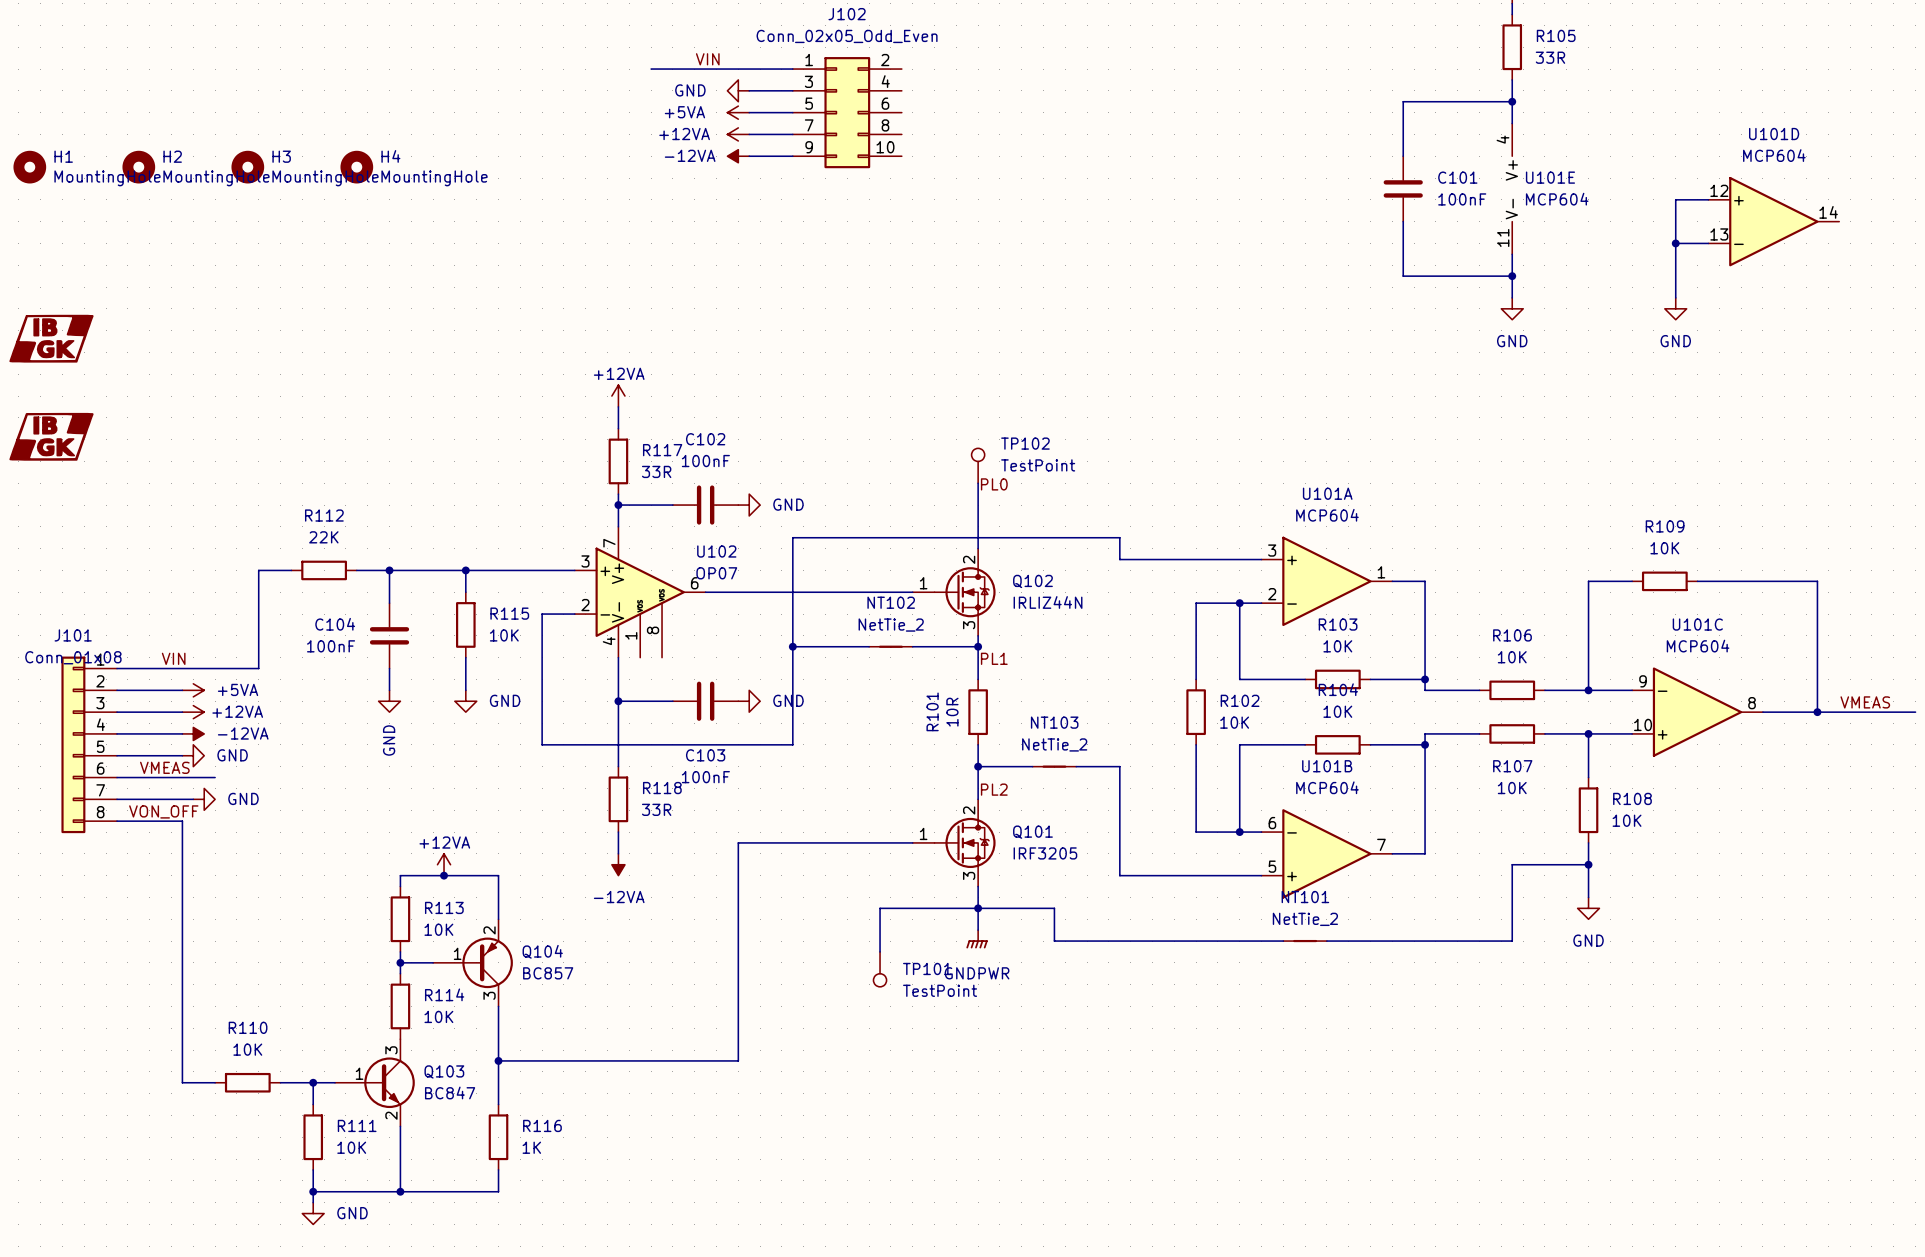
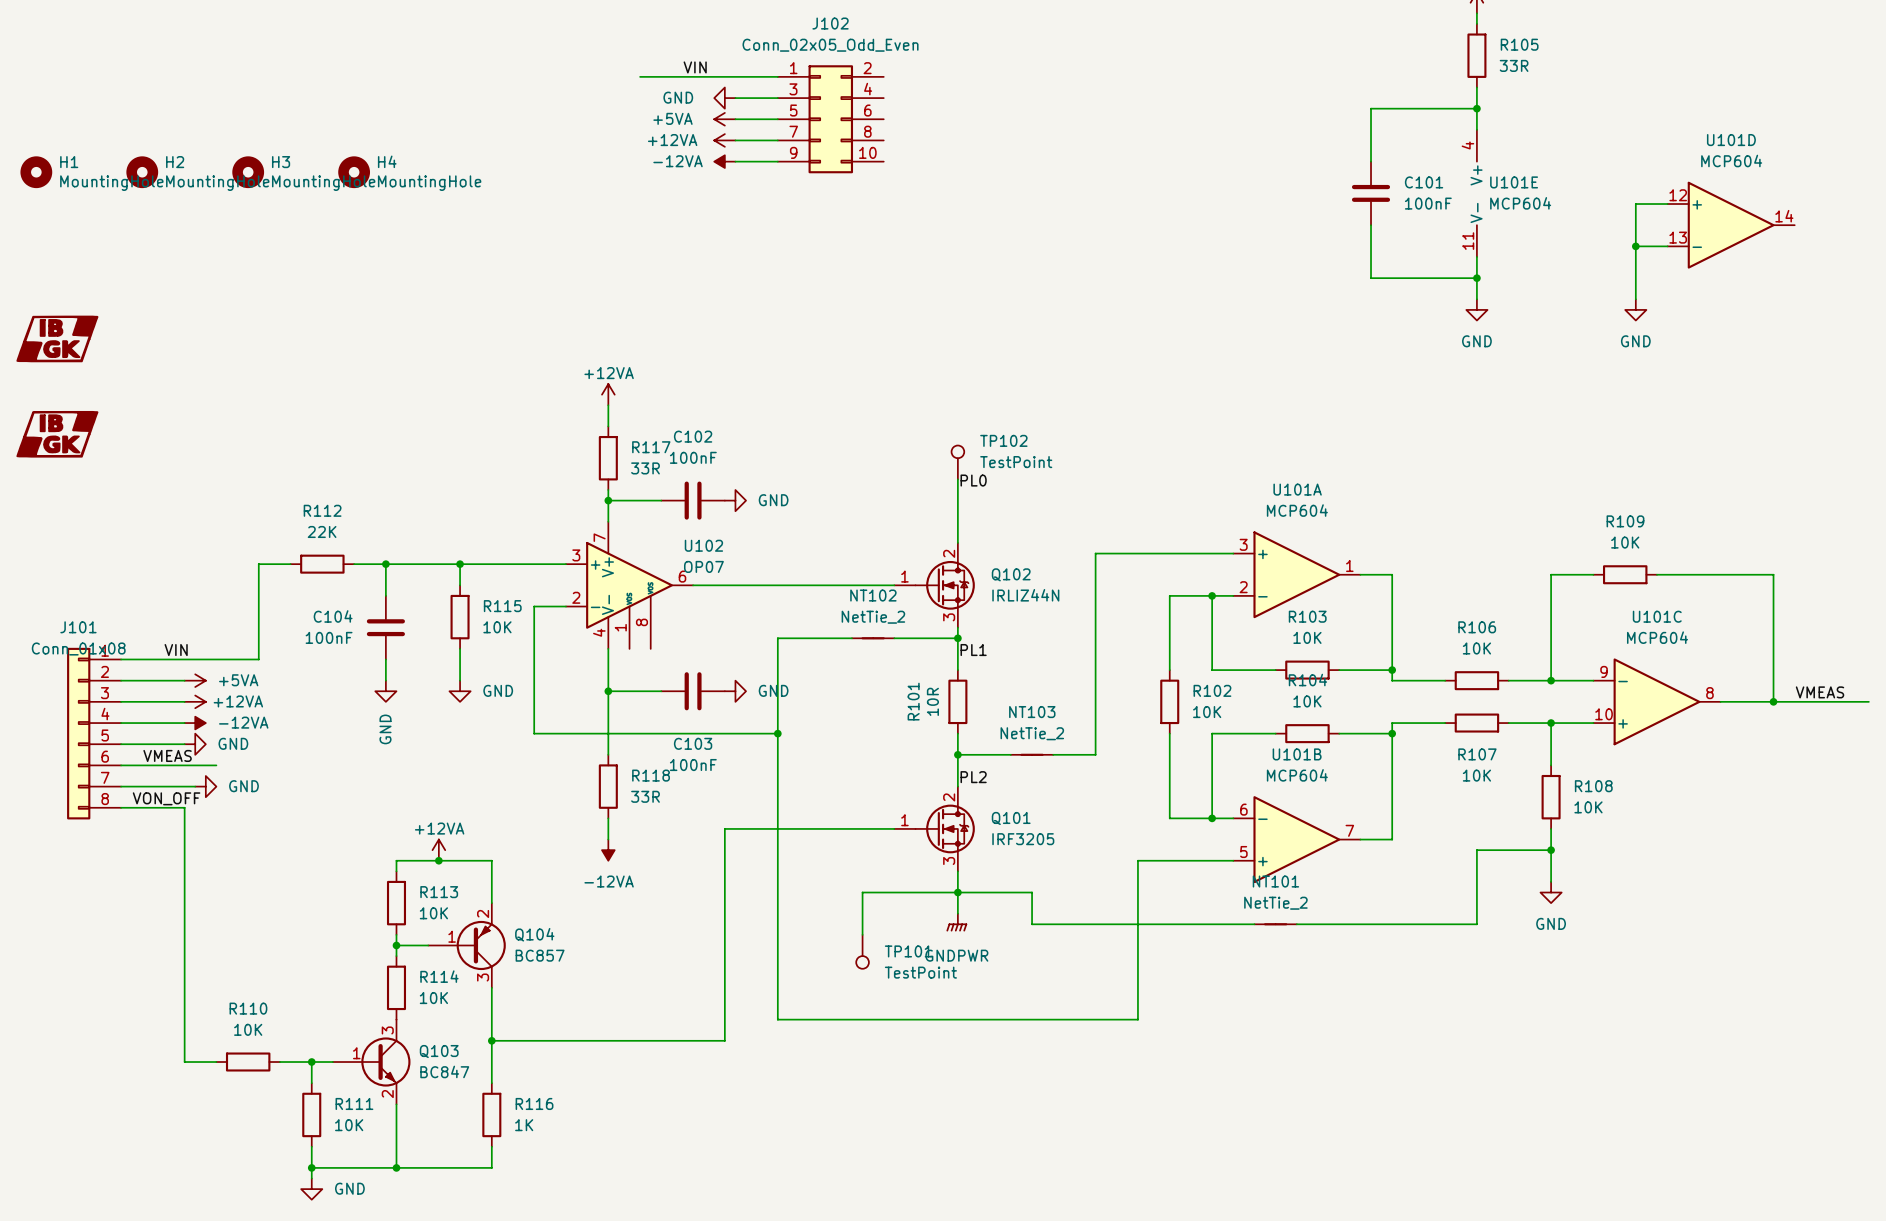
wire: (1119, 559) (1119, 537) (792, 537) (792, 646) -> none
junction: (792, 646) -> none
wire: none -> (777, 733) (777, 1019) (1137, 1019) (1137, 860)
junction: none -> (777, 733)
wire: (1119, 766) (1119, 875) (1163, 875) -> (1095, 754) (1095, 553)

